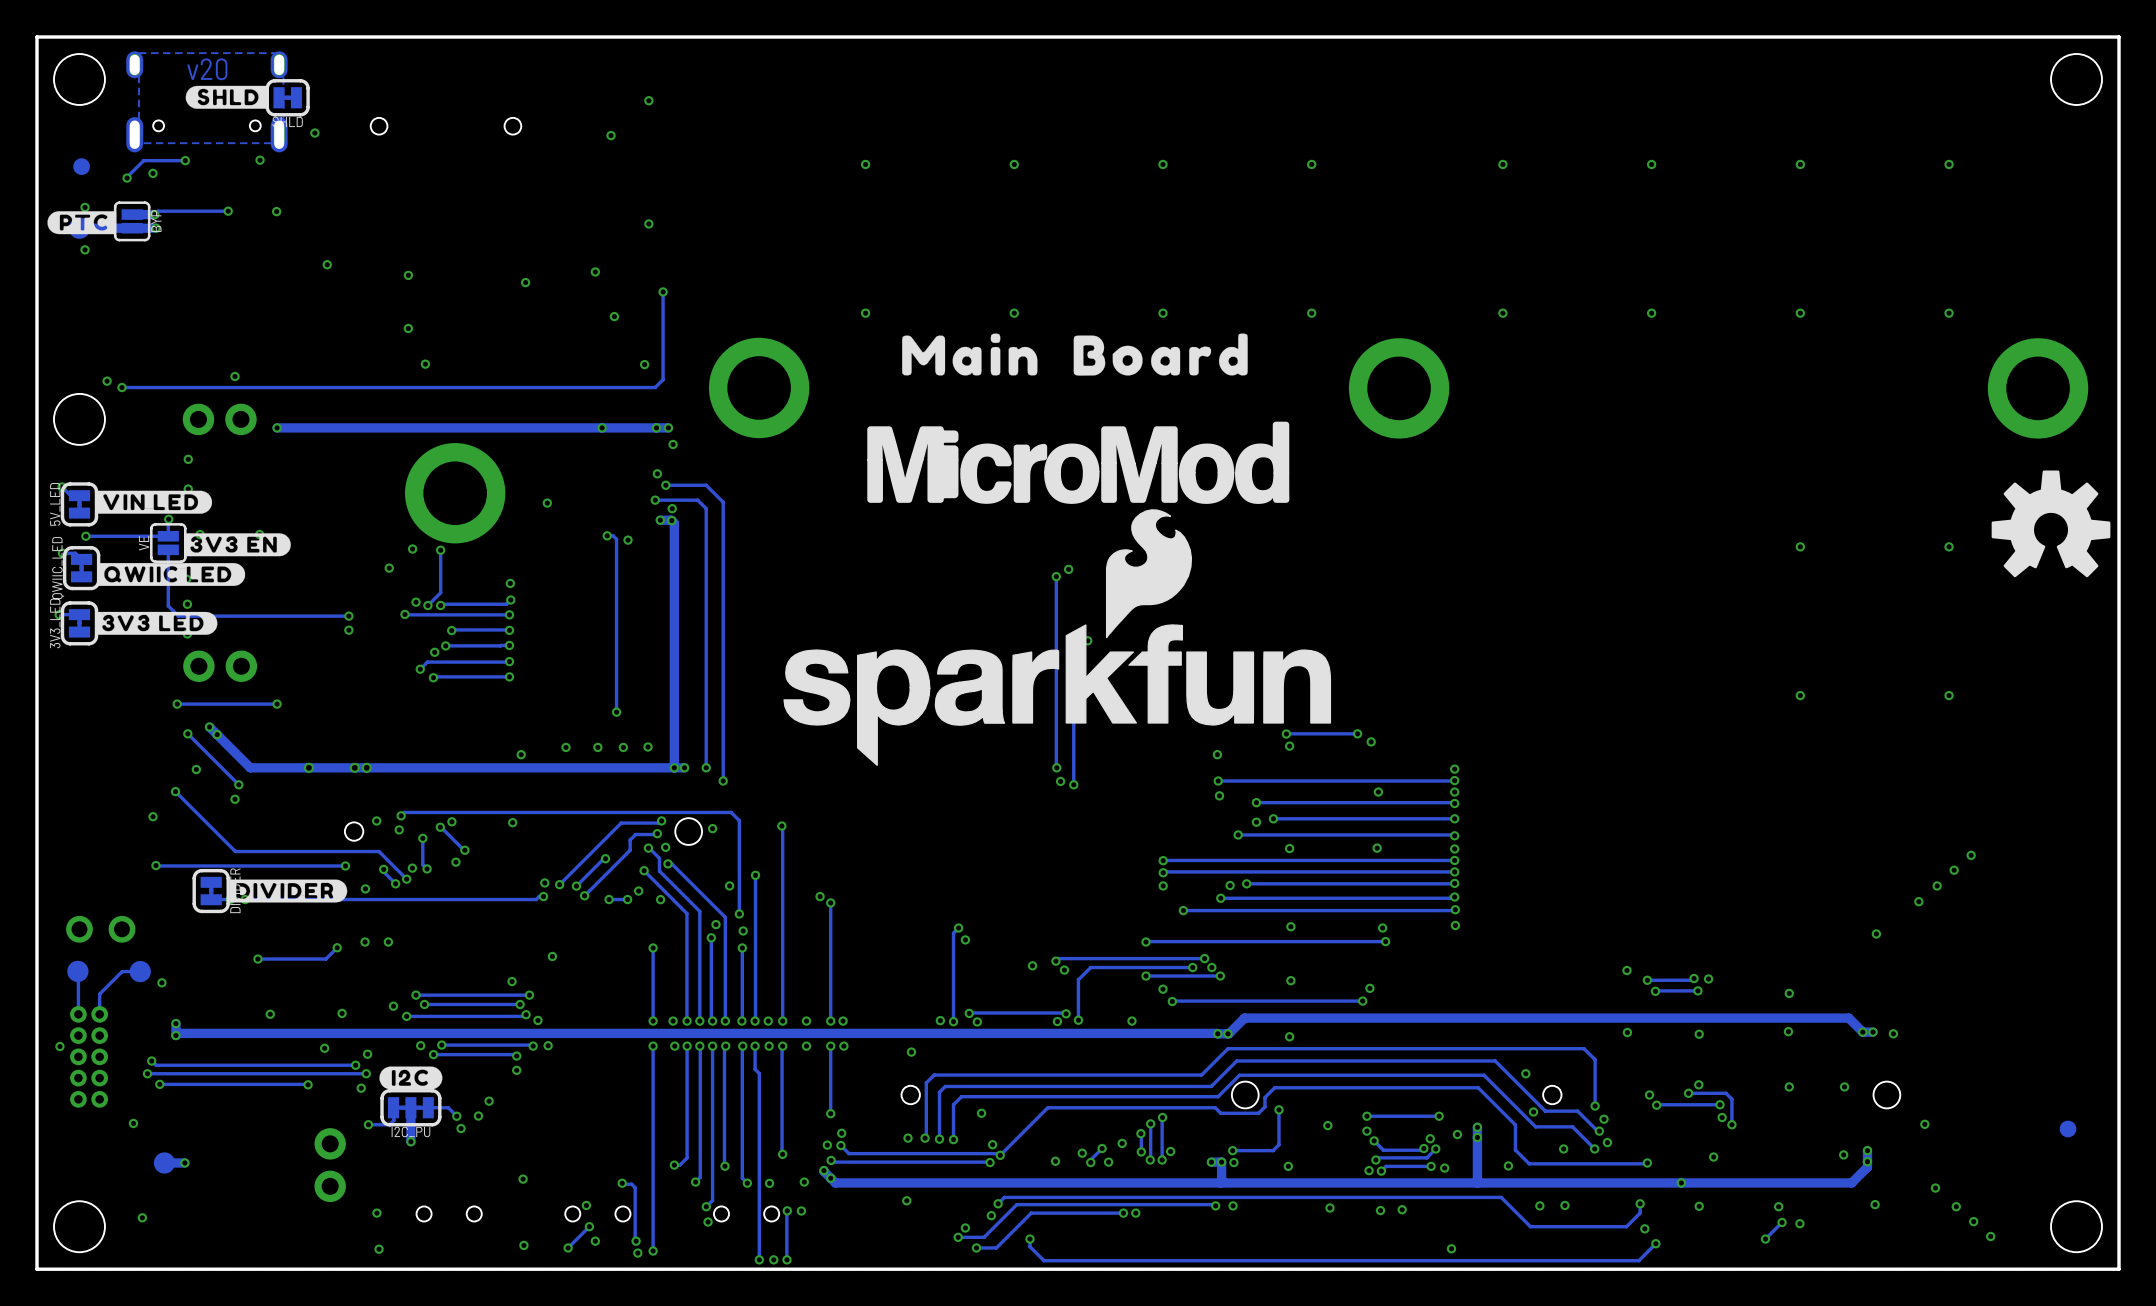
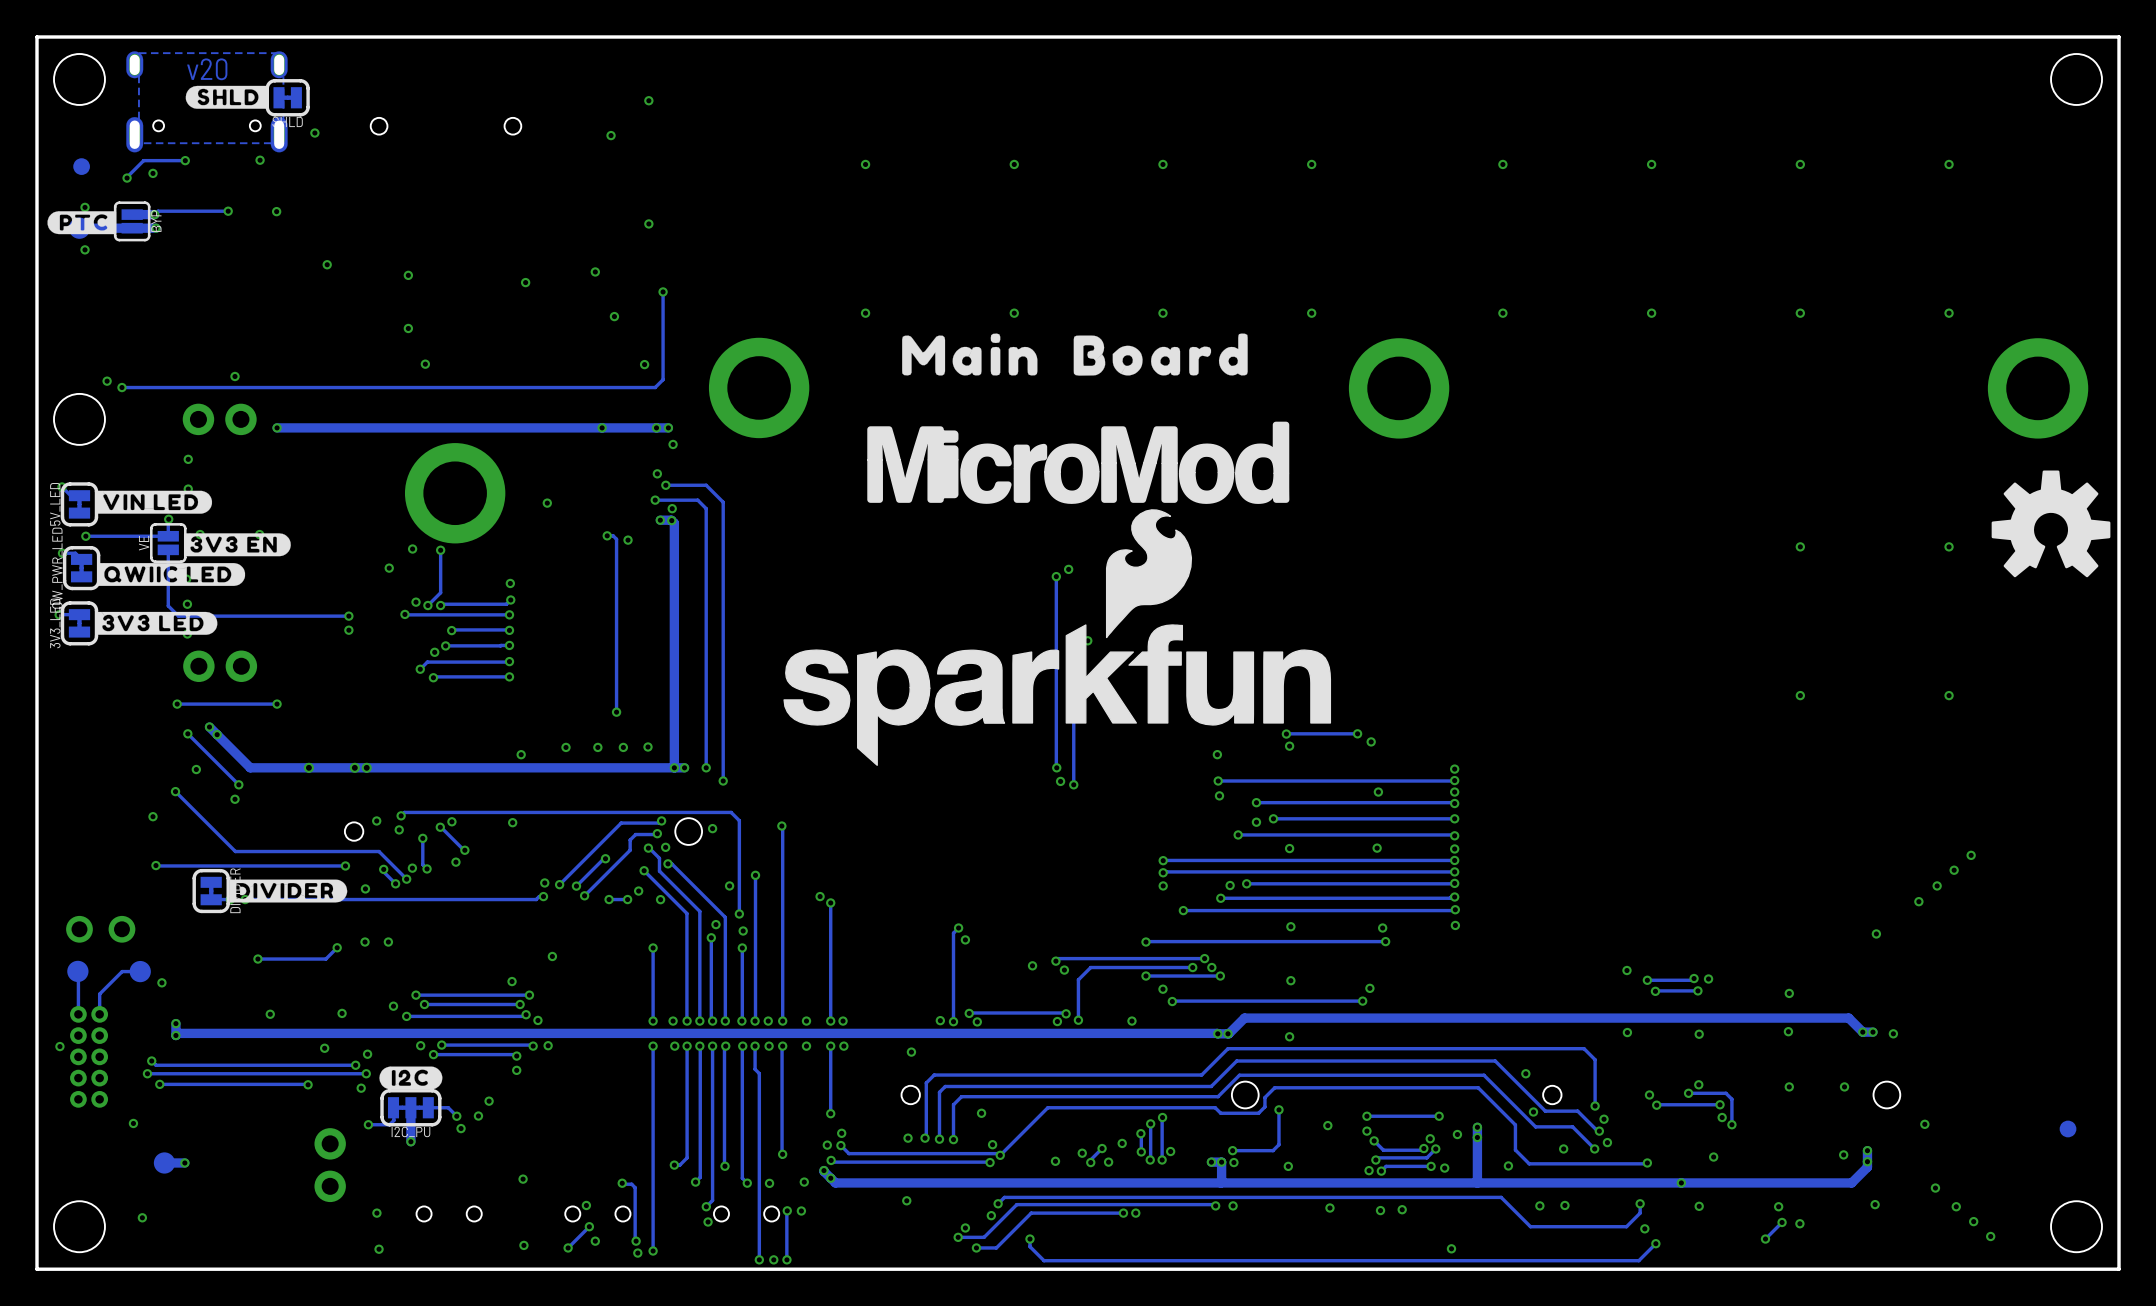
QWIIC_LED name: QWIIC_LED (58, 568) -> QW_PWR_LED (58, 568)

